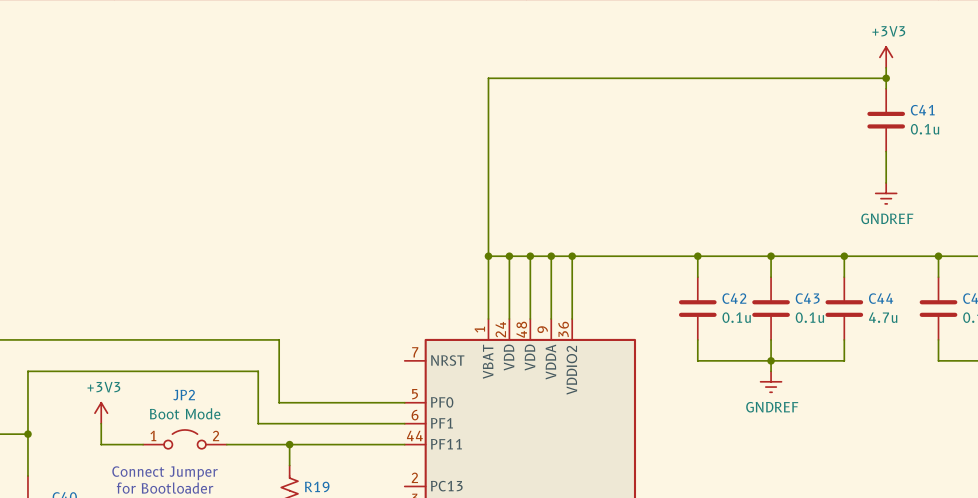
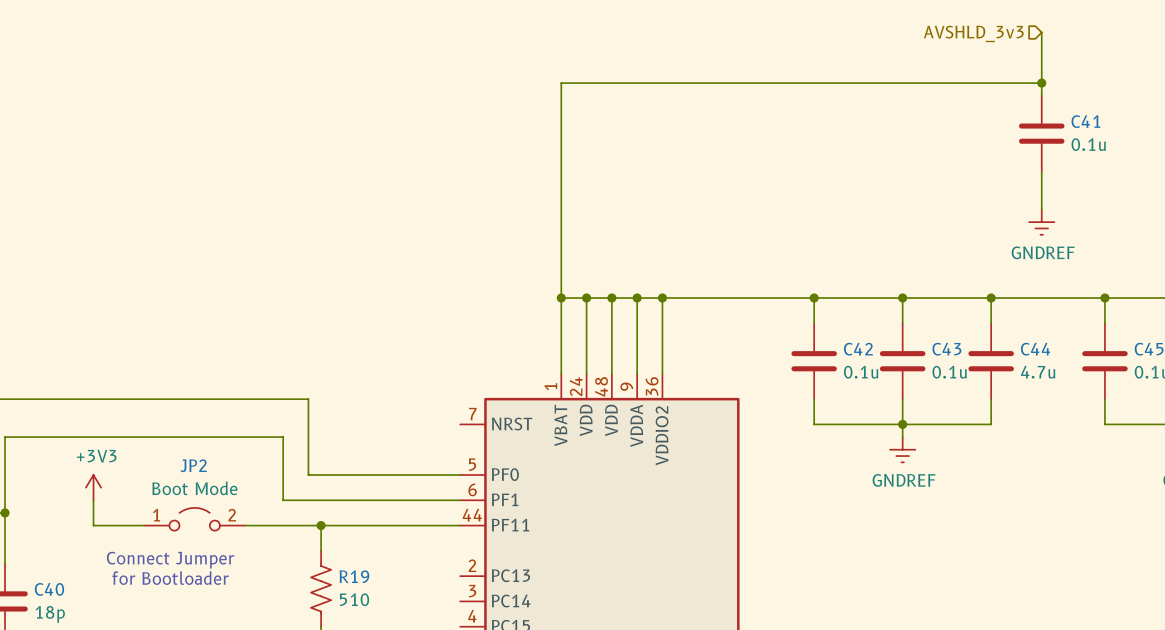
hierarchical label: none -> AVSHLD_3v3 (973, 33)
power symbol: +3V3 (886, 57) -> none

